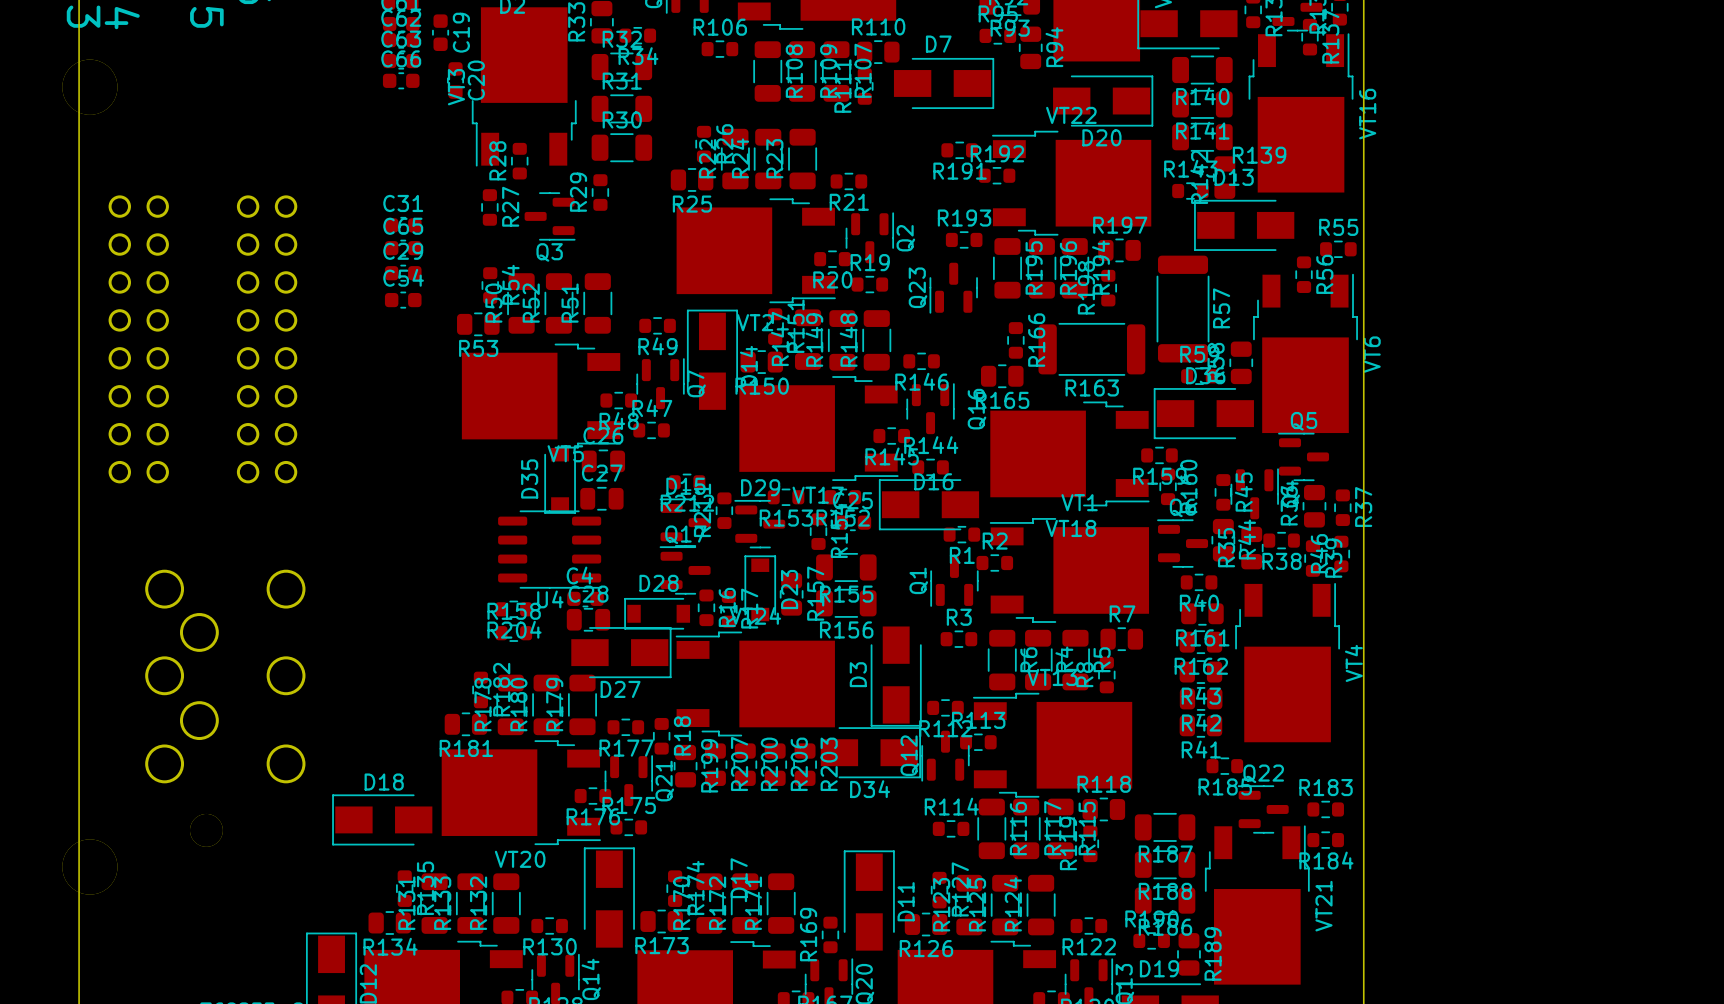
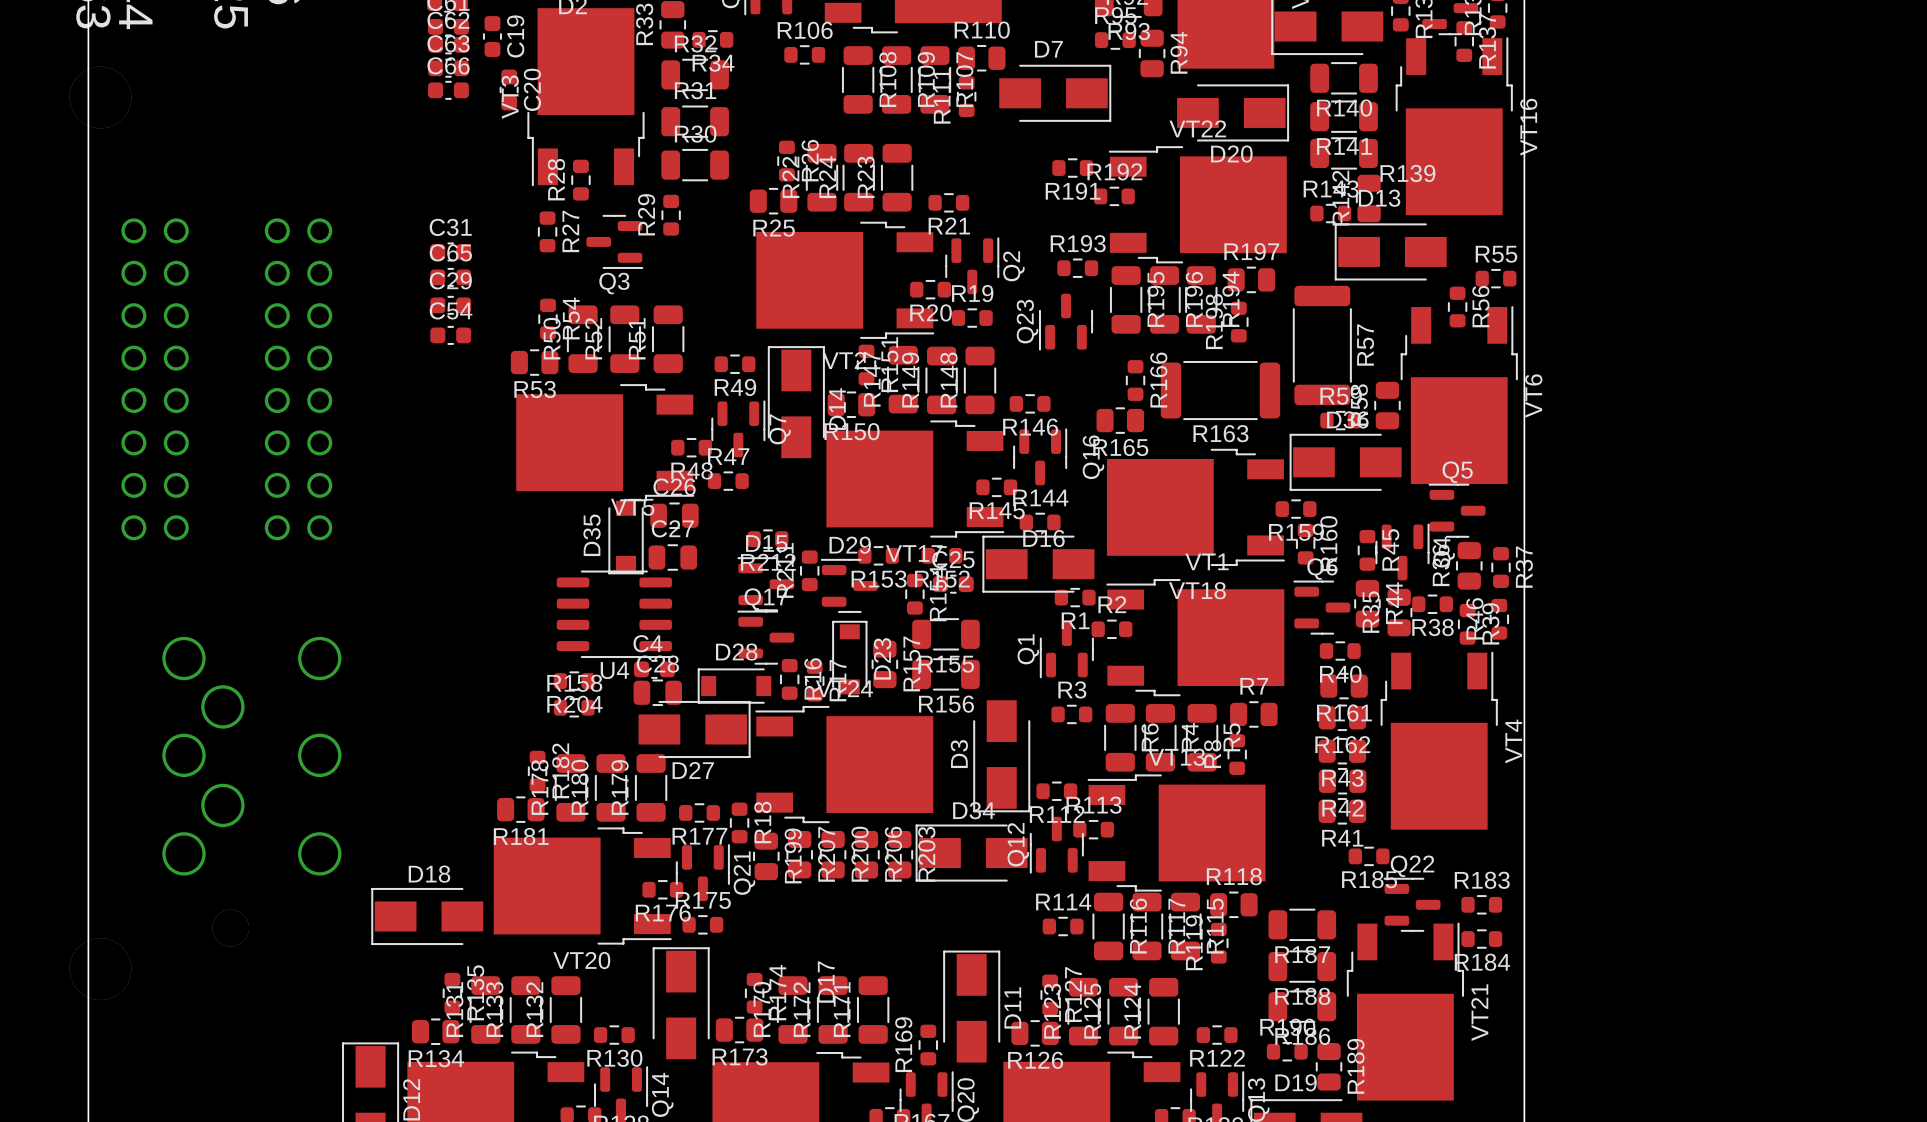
D34 rotation: 0° (870, 752) -> 180° (971, 853)

